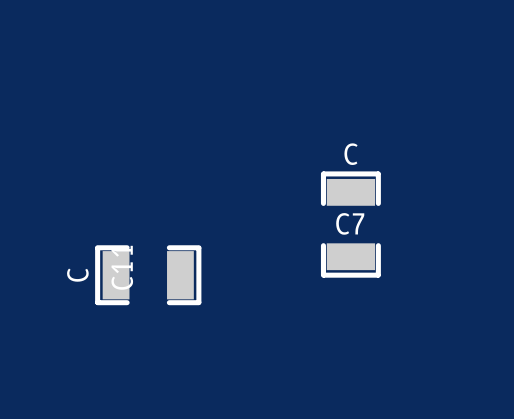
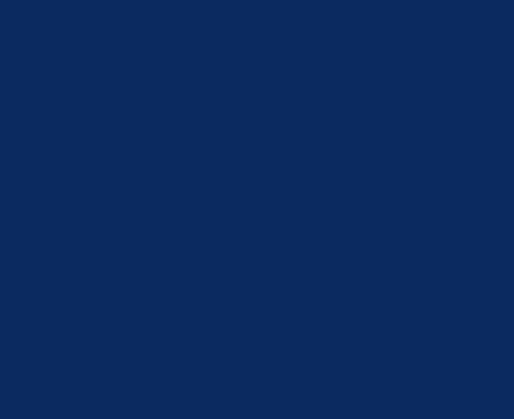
C7: C (350, 224) -> none
part: C (148, 275) -> none

